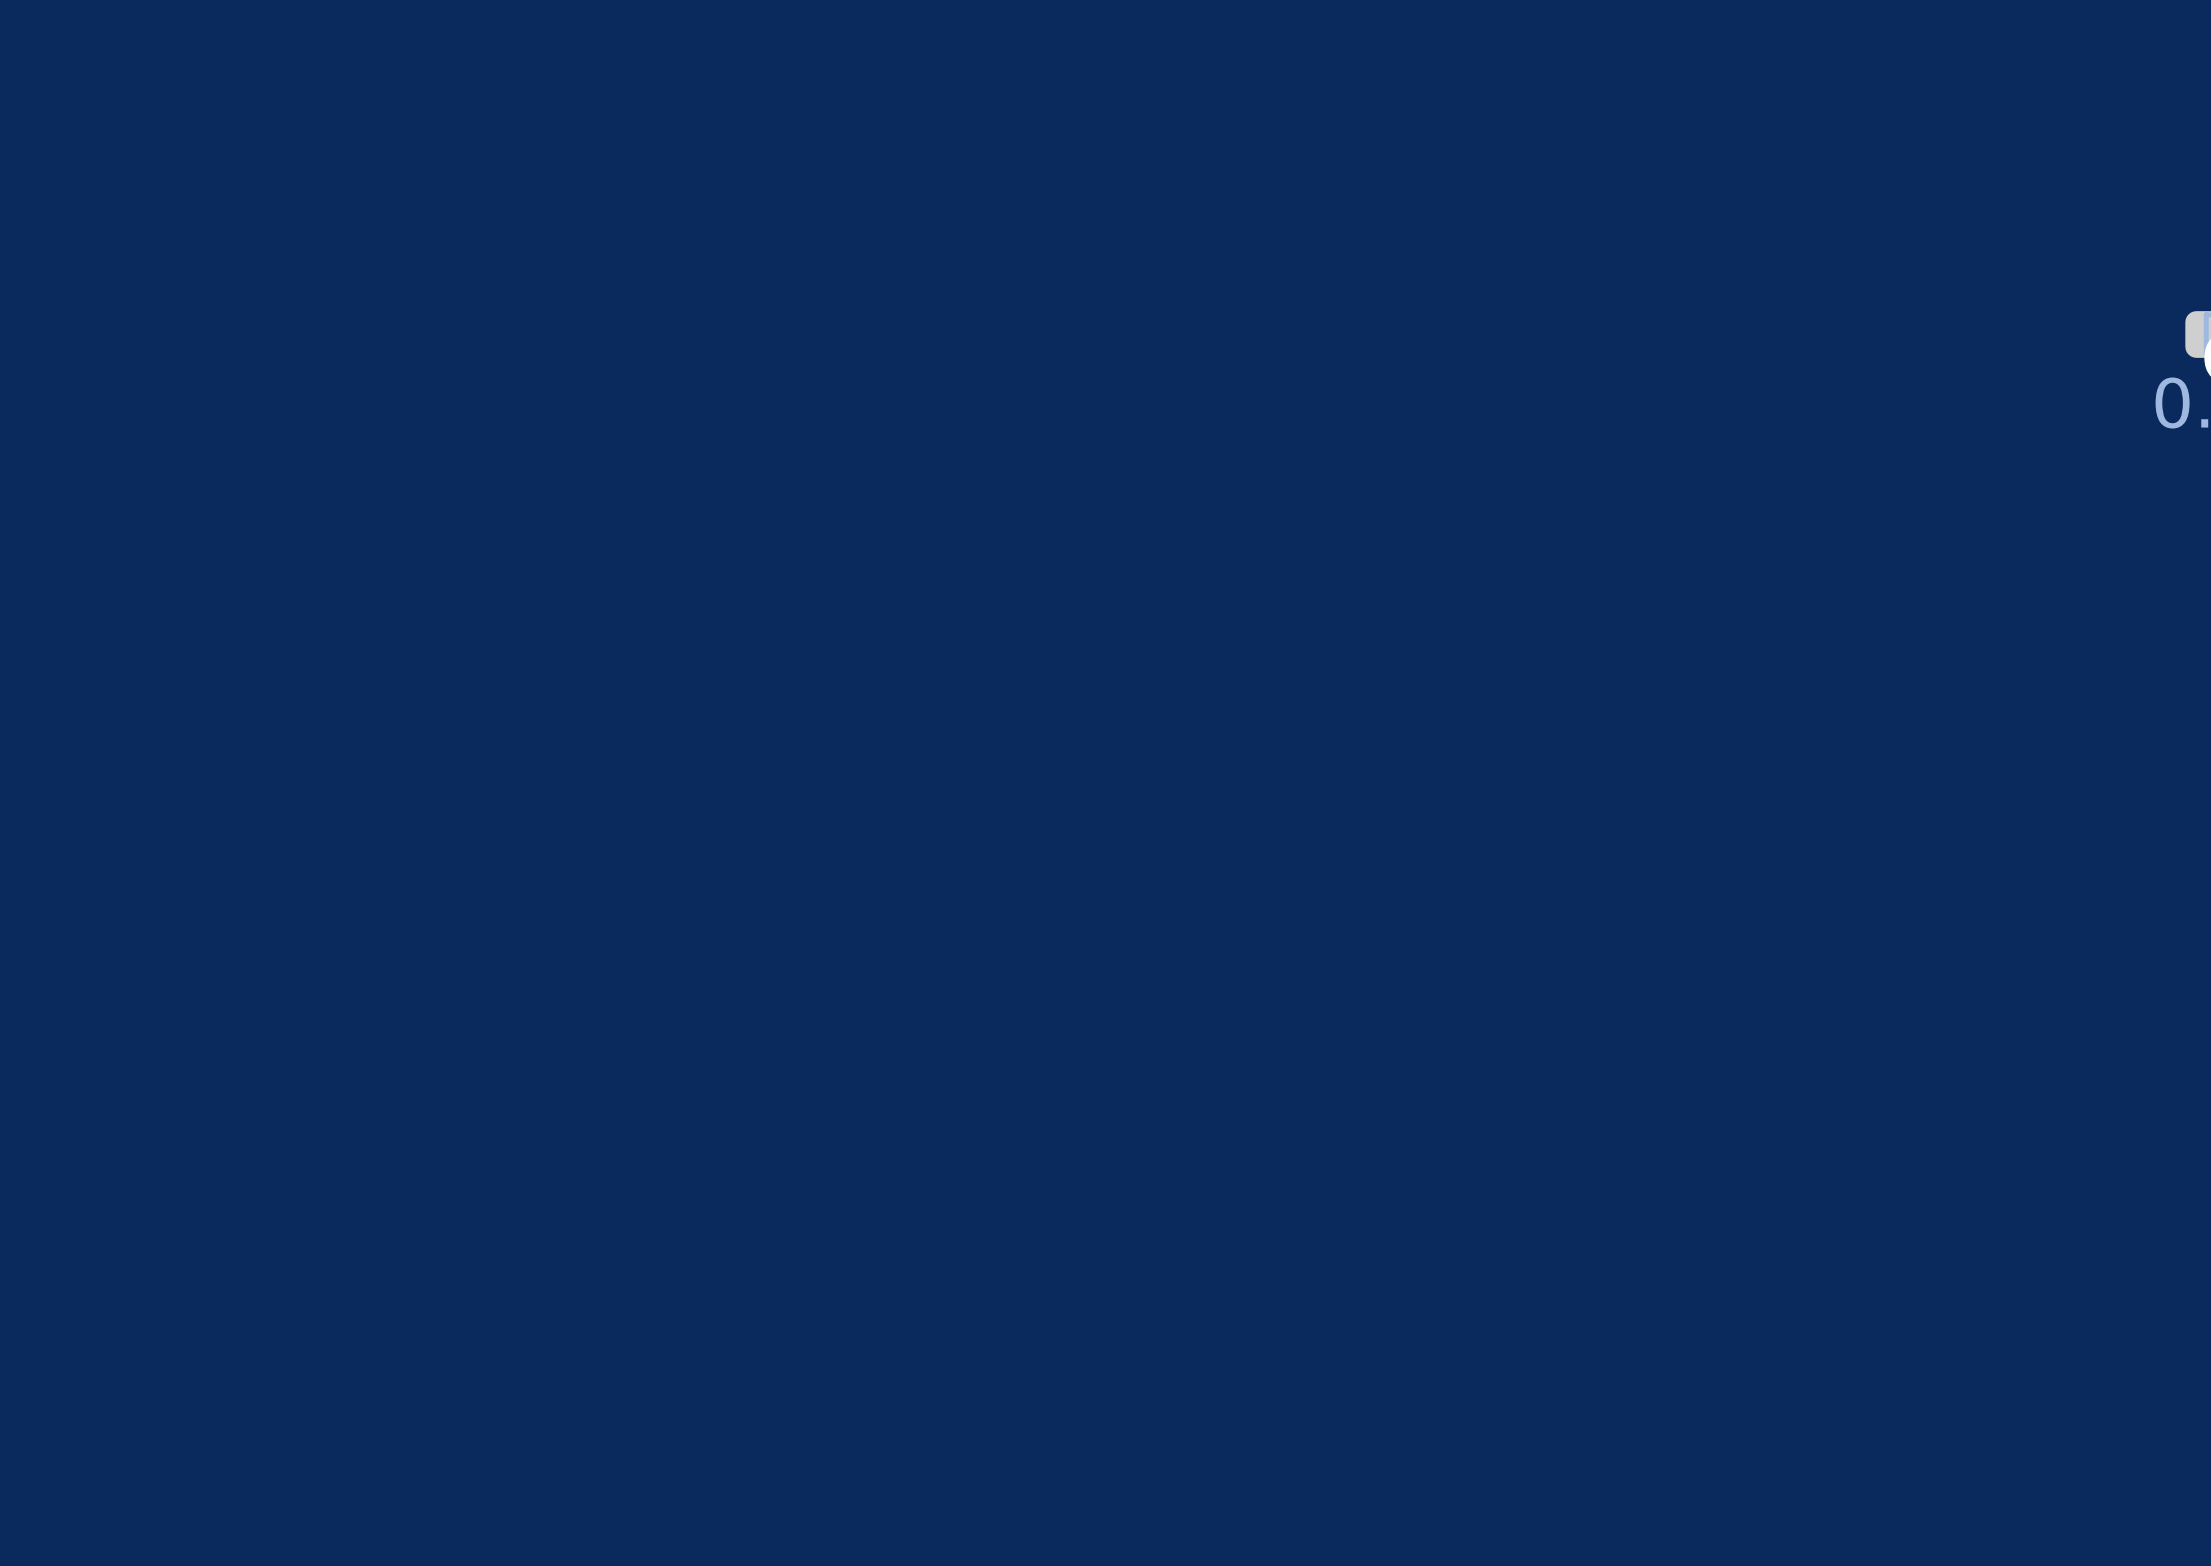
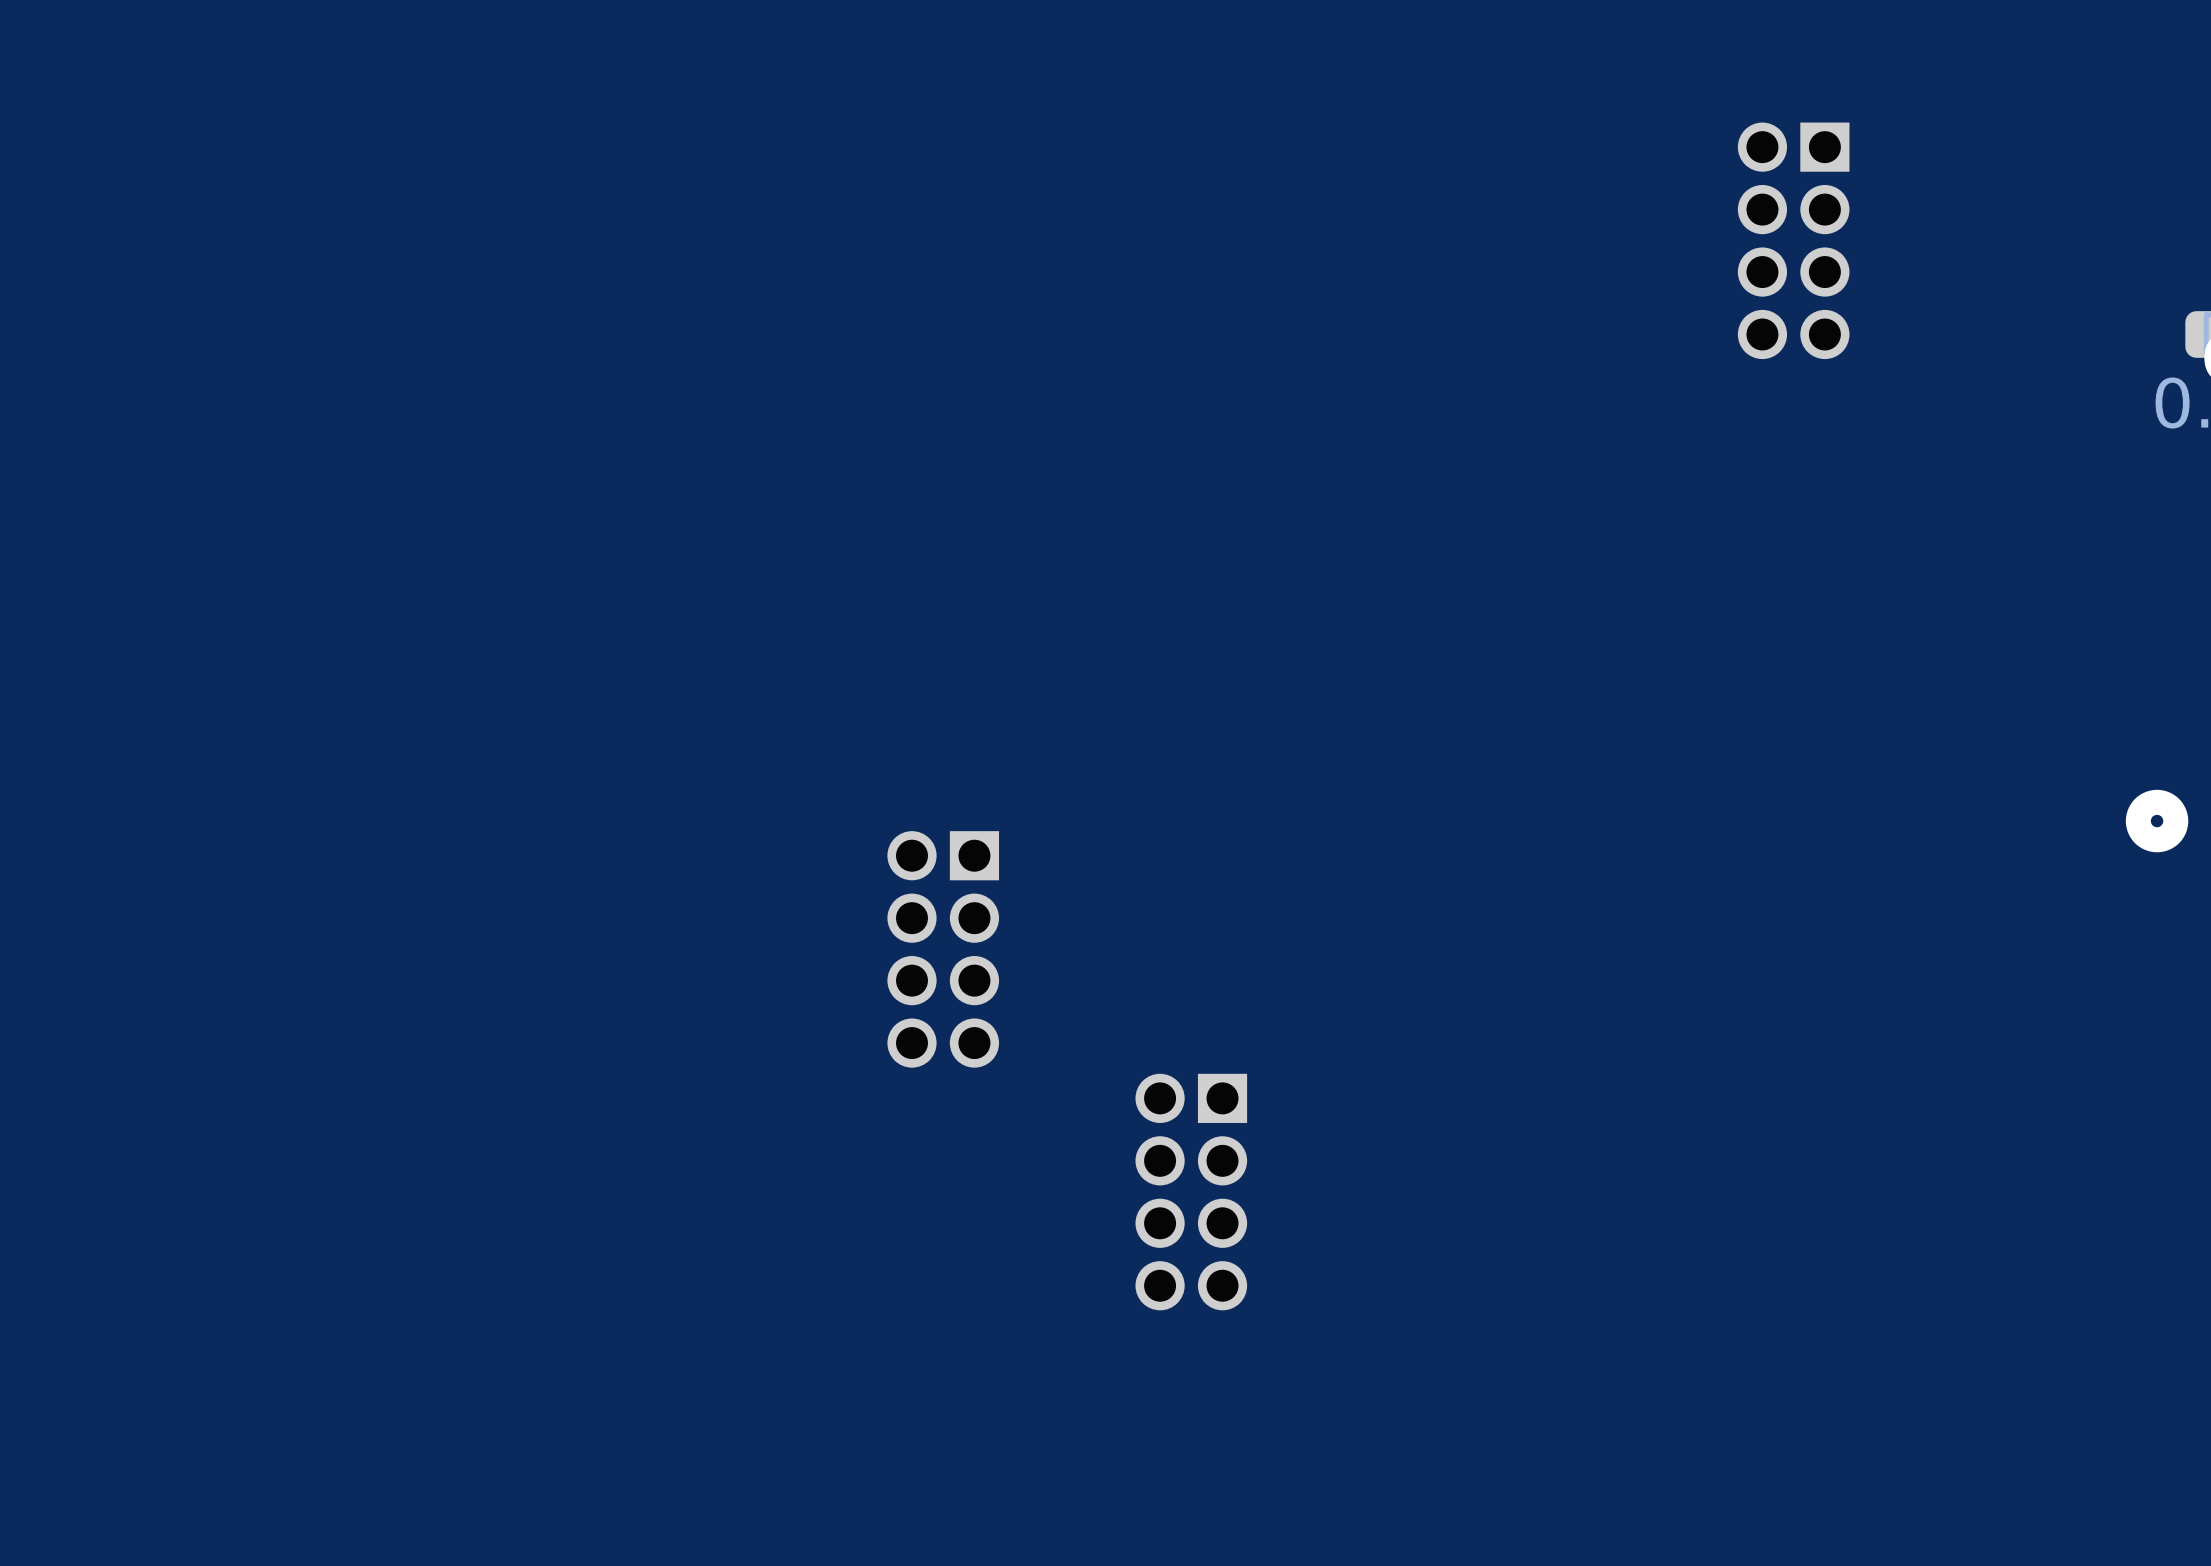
part: none -> (1793, 240)
part: none -> (2157, 821)
part: none -> (943, 949)
part: none -> (1191, 1192)

